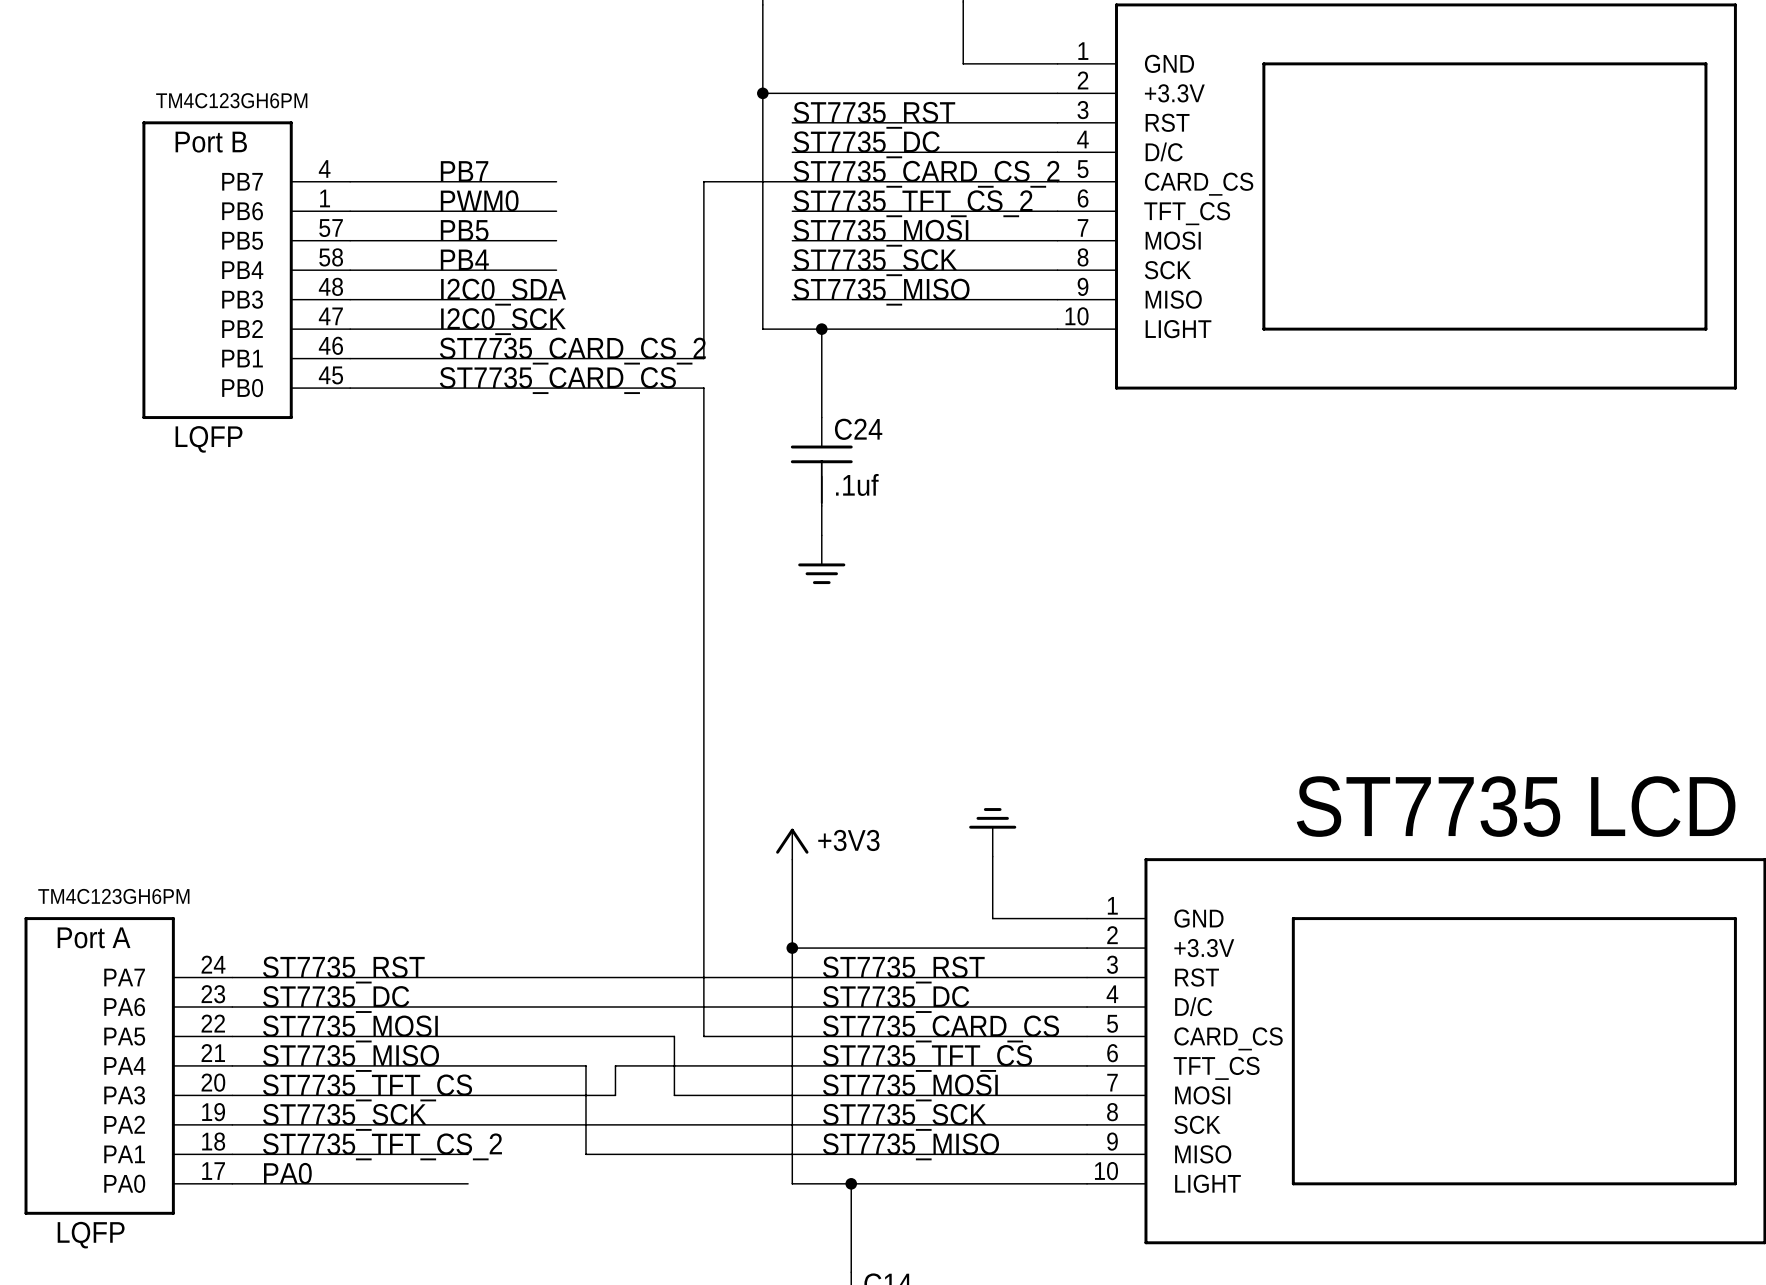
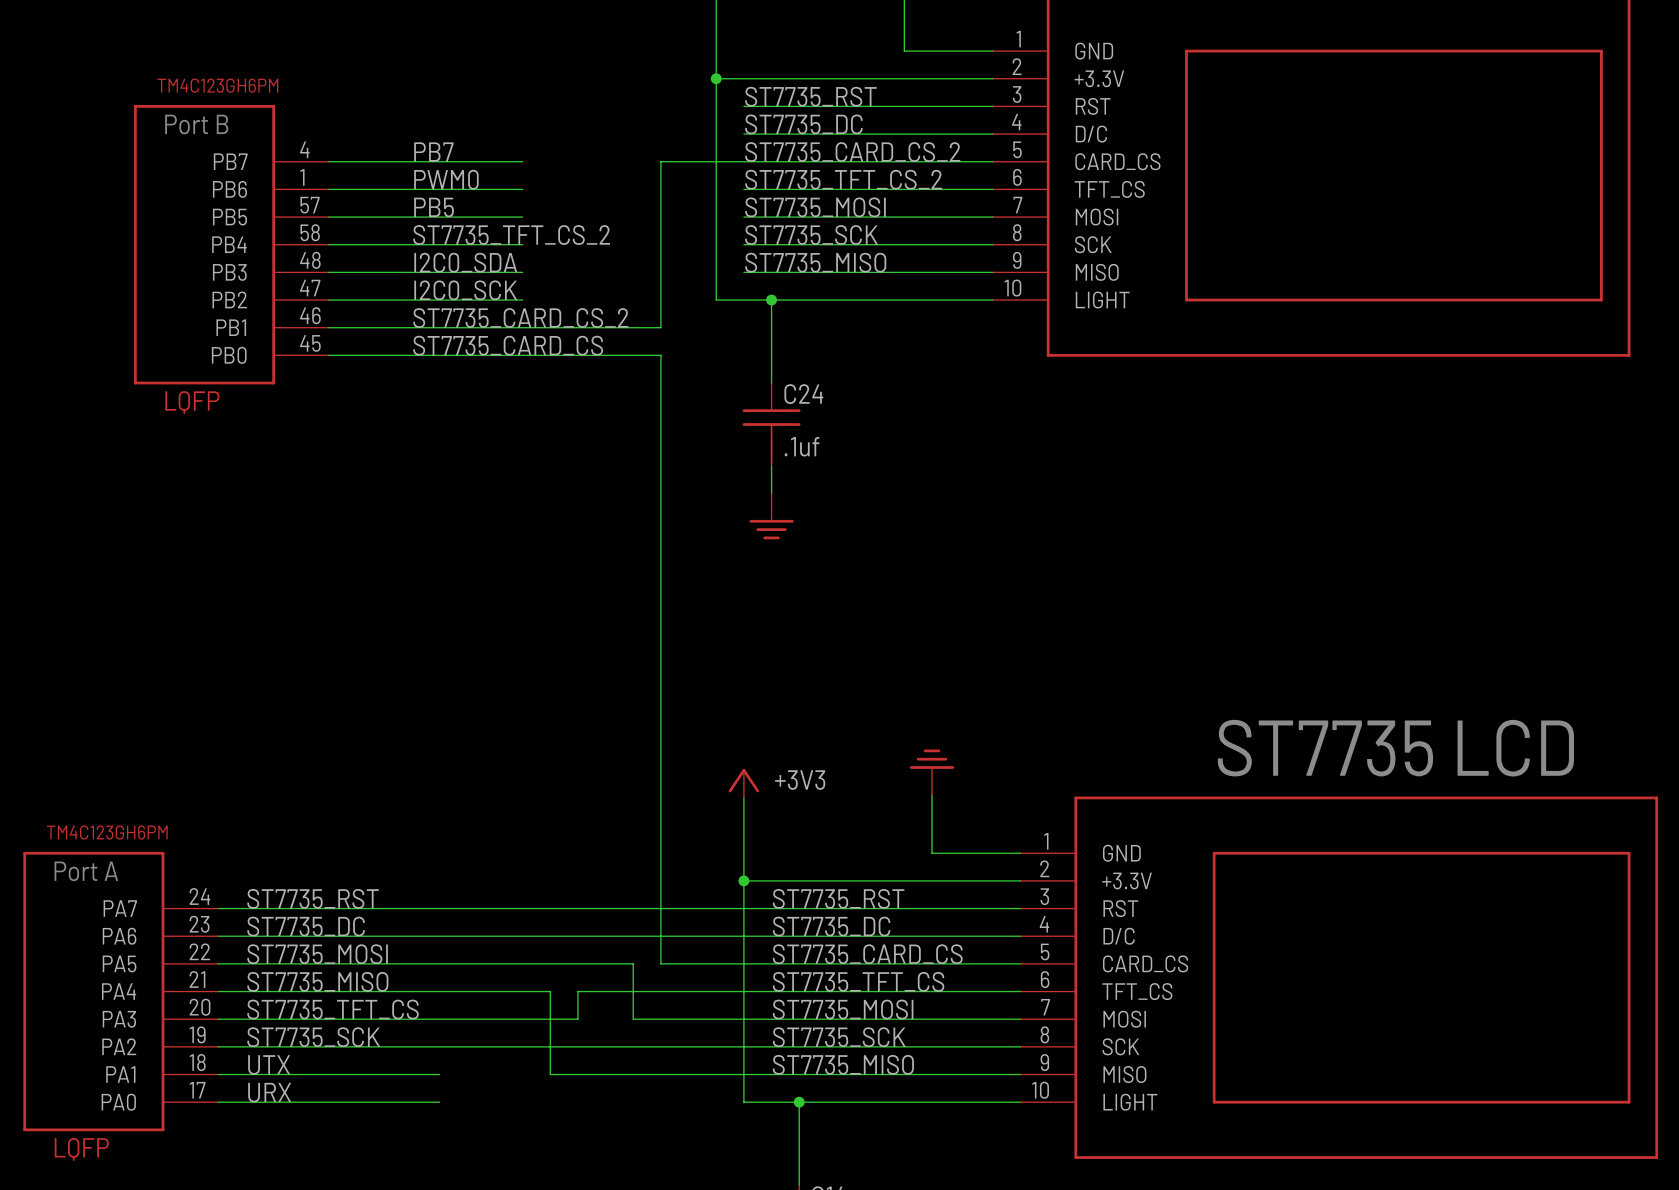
label: PB4 (464, 259) -> ST7735_TFT_CS_2 (511, 235)
label: ST7735_TFT_CS_2 (382, 1146) -> UTX (269, 1064)
label: PA0 (287, 1173) -> URX (269, 1092)

